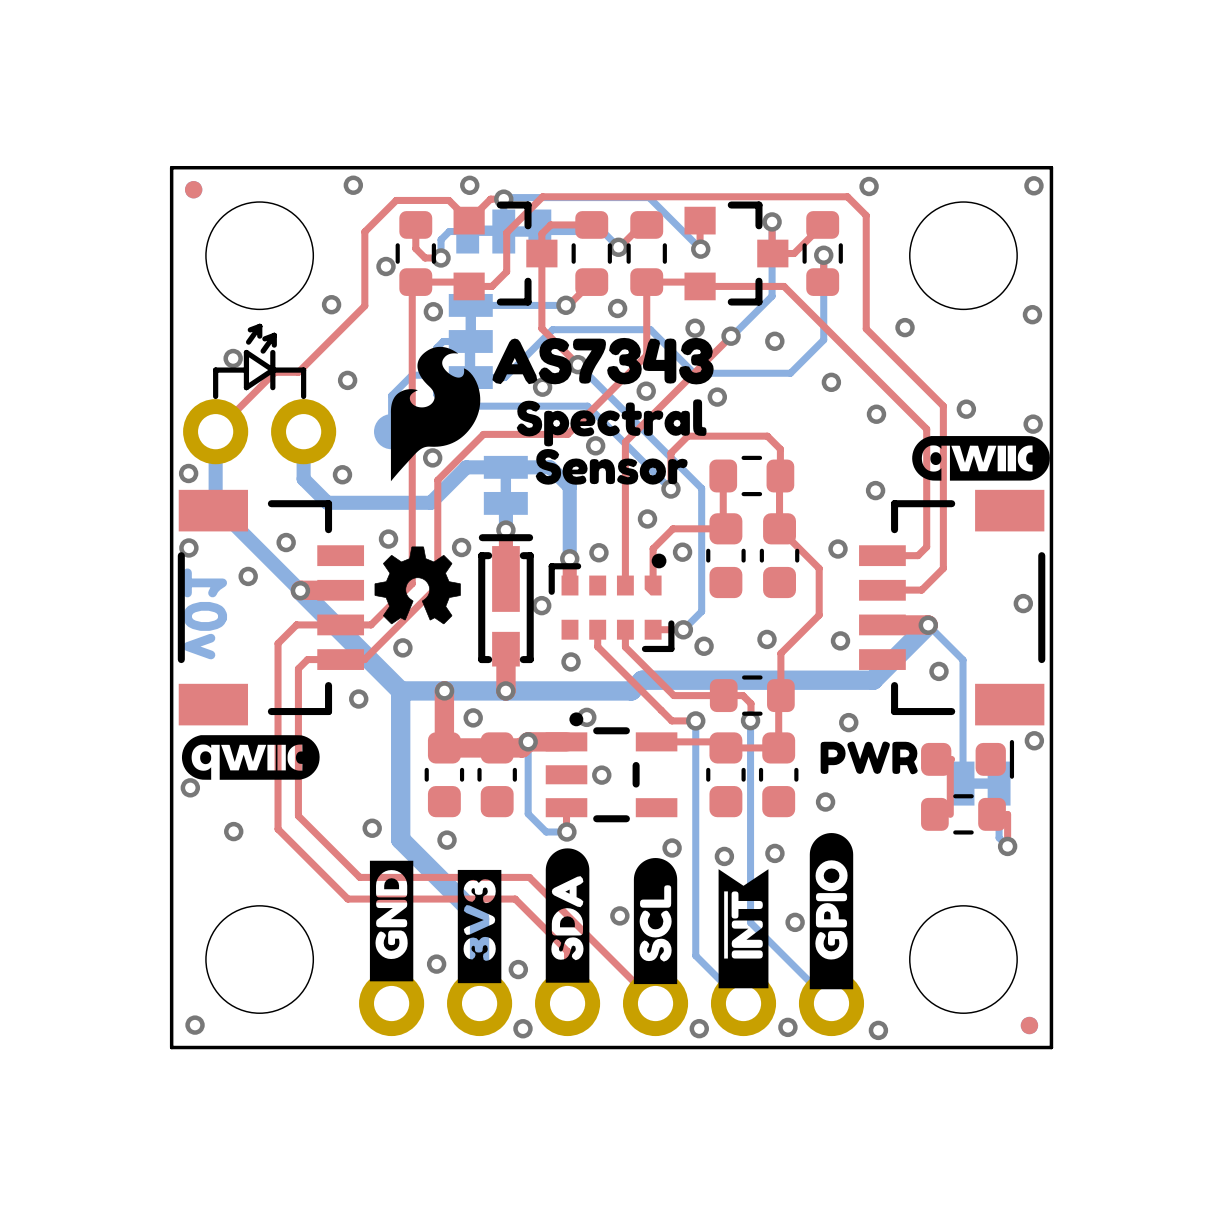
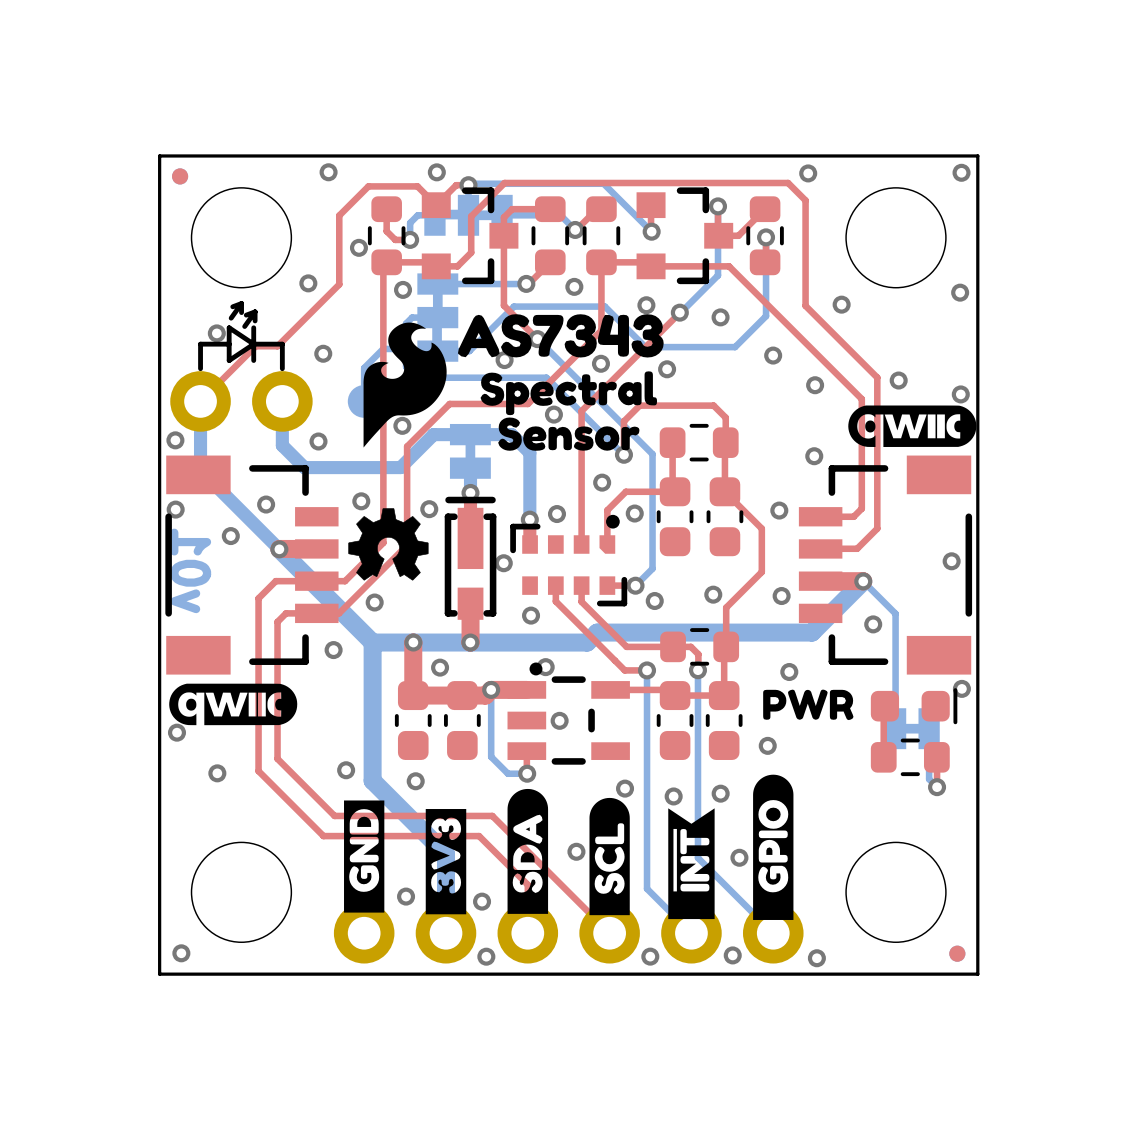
part position: (967, 759) -> (914, 706)
part position: (963, 814) -> (910, 757)

